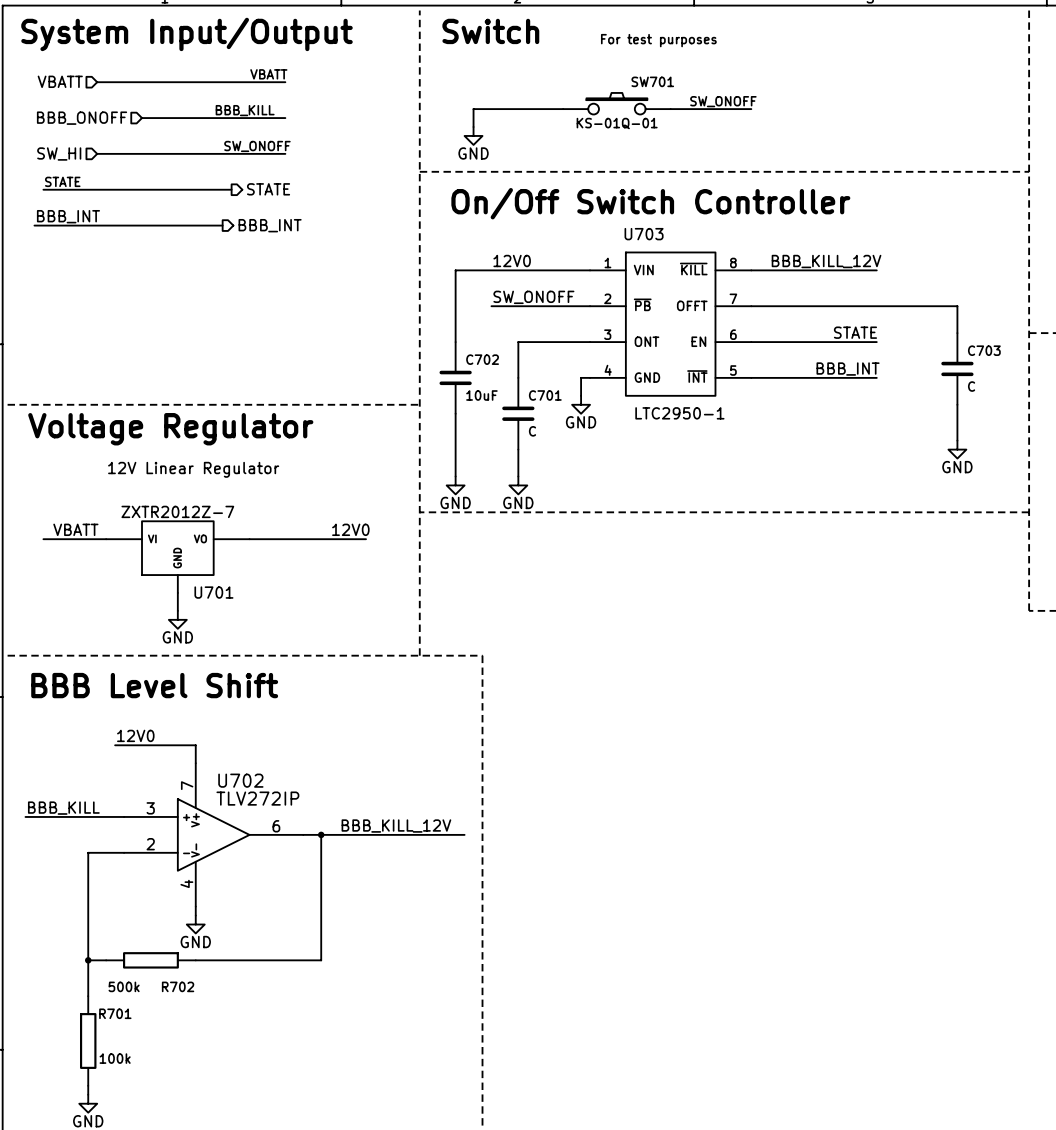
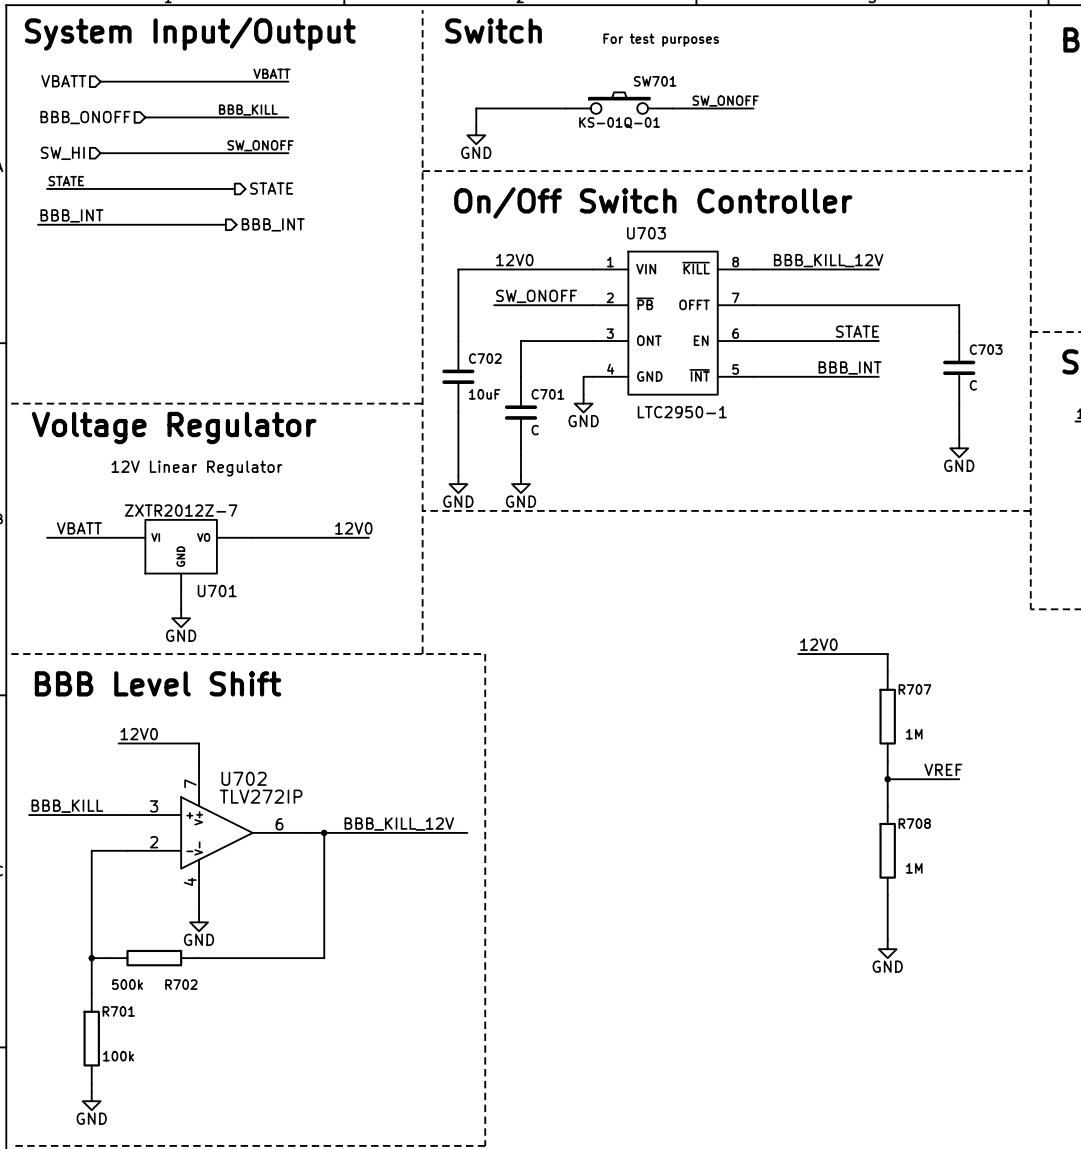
label: none -> 12V0 (818, 644)
wire: none -> (798, 654) (887, 654) (887, 671)
R707: none -> 1M (887, 716)
wire: none -> (887, 761) (887, 806)
label: none -> VREF (943, 769)
wire: none -> (887, 779) (959, 779)
junction: none -> (887, 779)
R708: none -> 1M (887, 850)
wire: none -> (887, 895) (887, 940)
power symbol: none -> GND (887, 949)

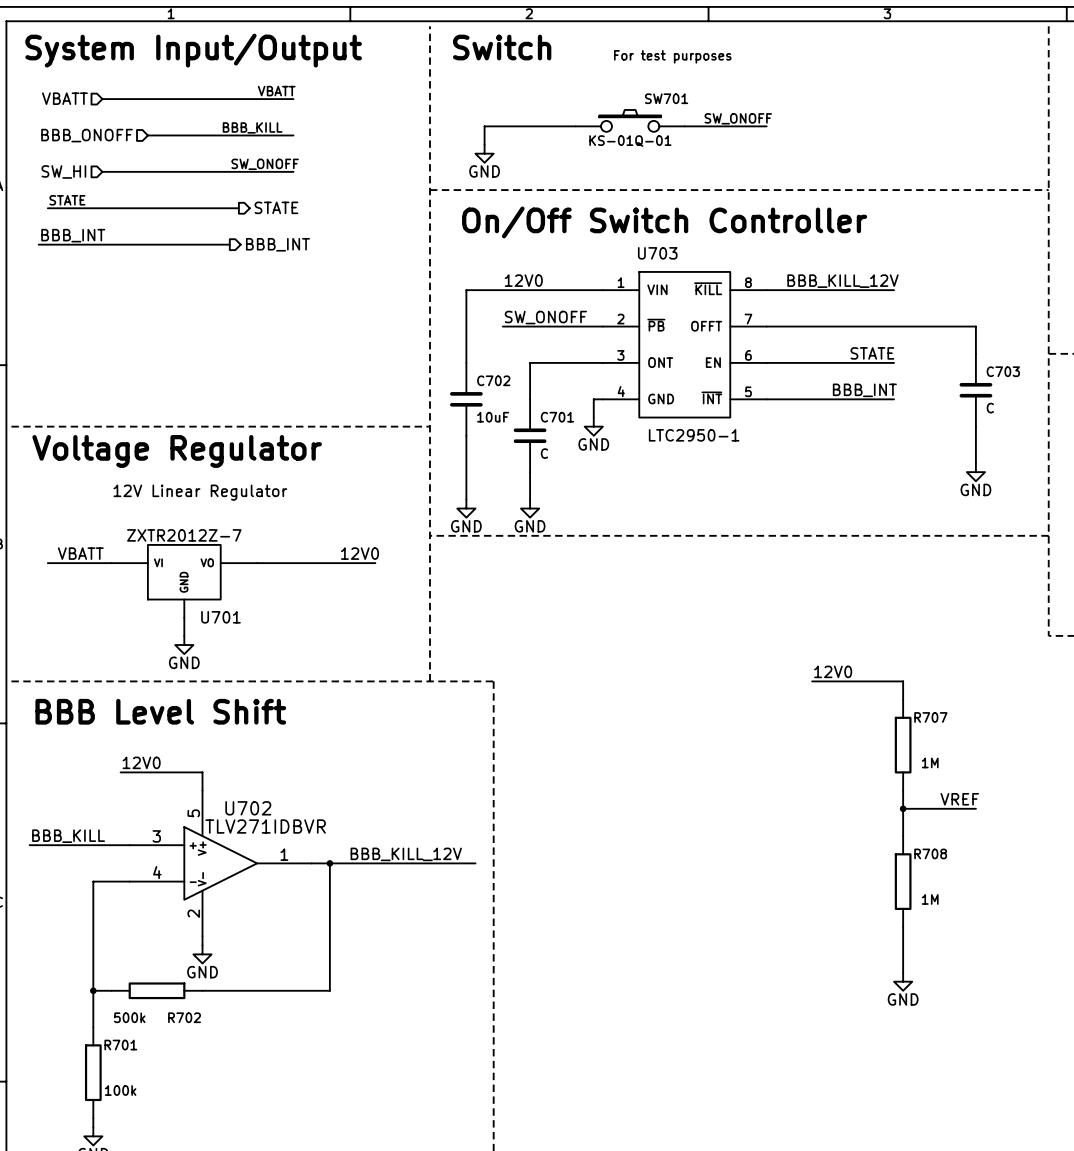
U702 pin number: 7 (190, 783) -> 5 (193, 813)
U702 value: TLV272IP (261, 796) -> TLV271IDBVR (265, 826)
U702 pin number: 6 (279, 824) -> 1 (284, 854)
U702 pin number: 2 (154, 842) -> 4 (157, 872)
U702 pin number: 4 (190, 881) -> 2 (193, 913)

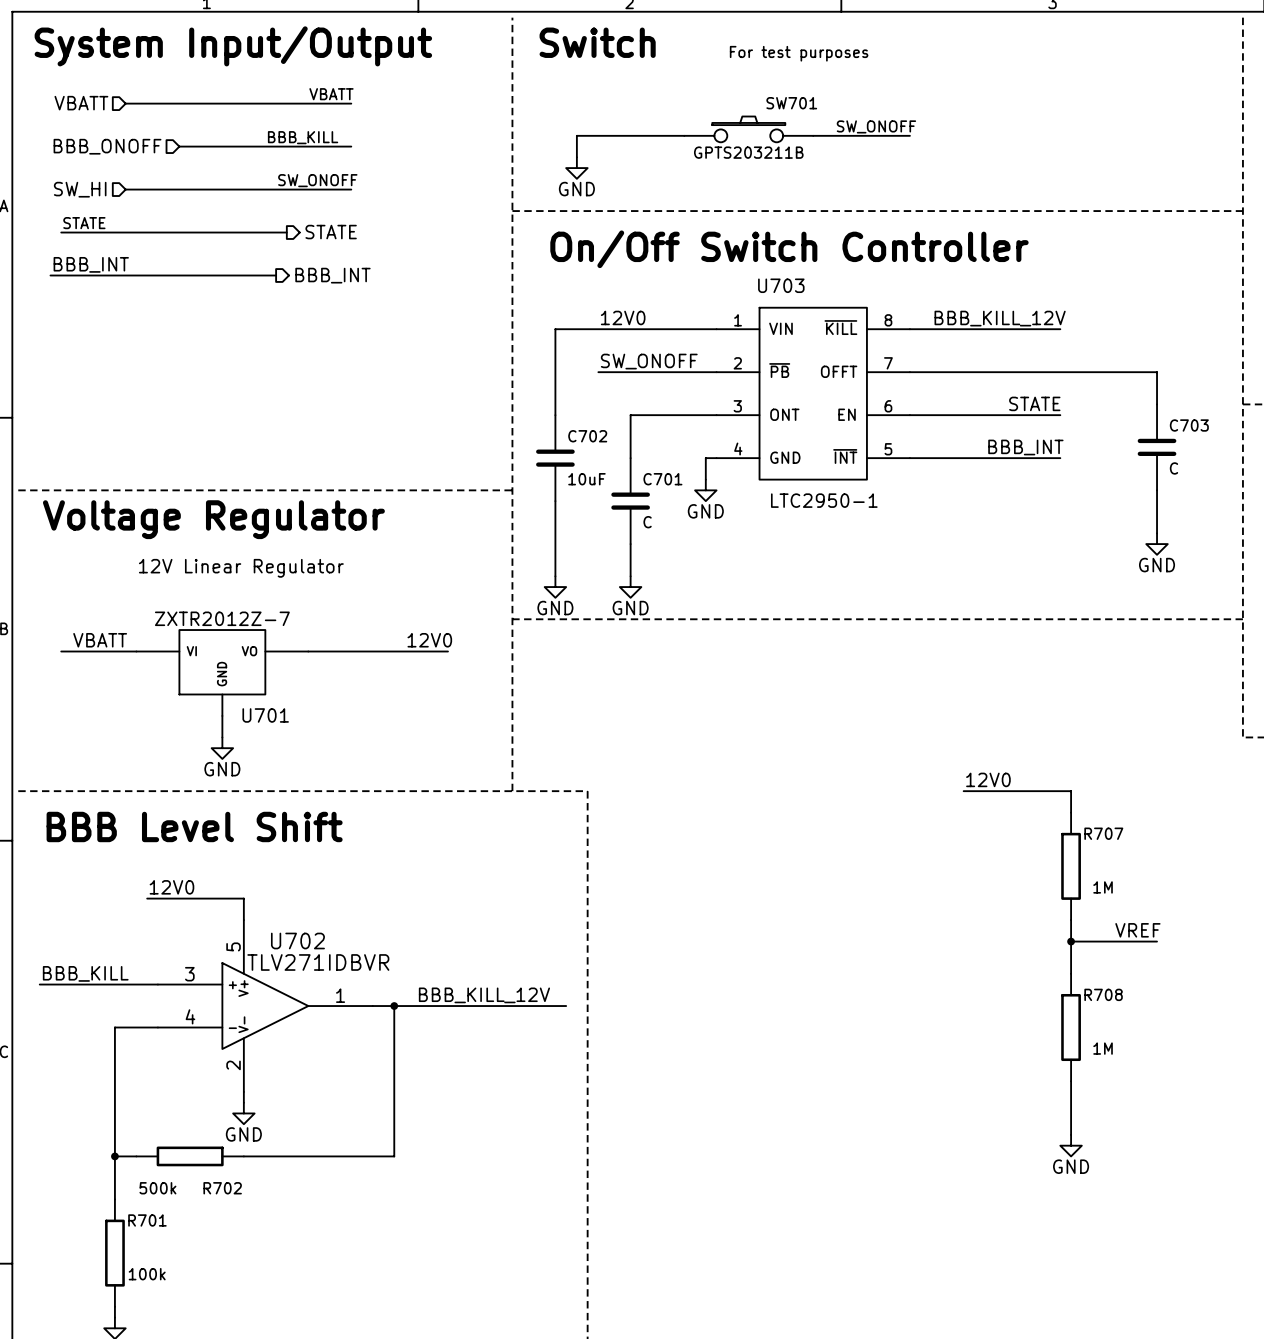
SW701 value: KS-01Q-01 (630, 141) -> GPTS203211B (748, 152)

